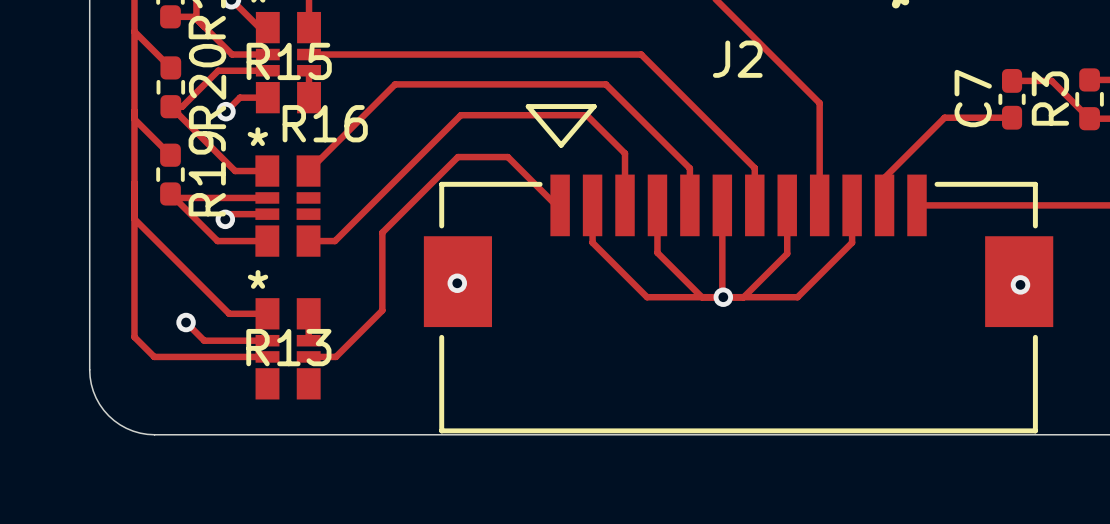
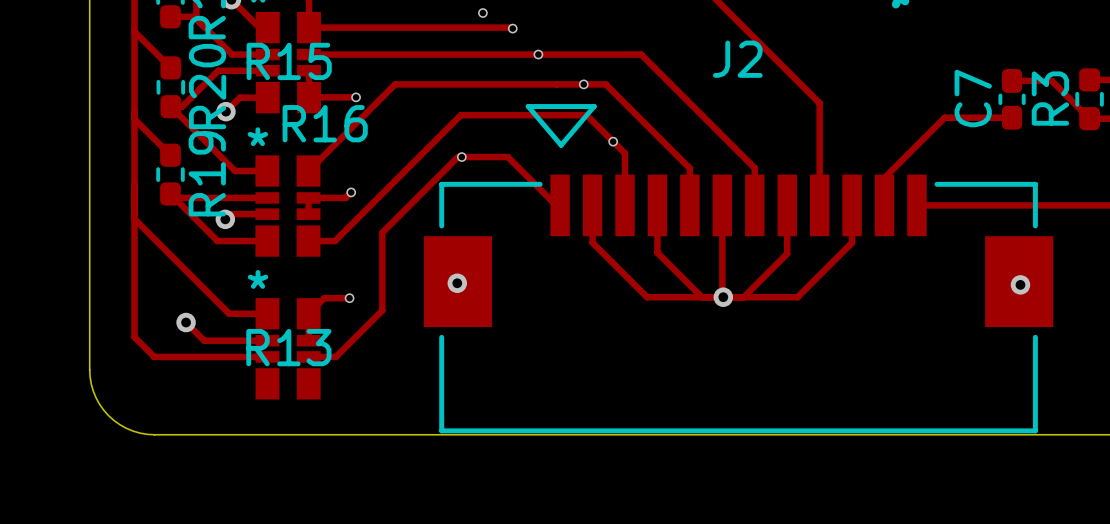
via: none -> (482, 13)
track: none -> (309, 27) (512, 28)
via: none -> (512, 28)
via: none -> (538, 54)
via: none -> (583, 84)
track: none -> (309, 97) (356, 97)
via: none -> (356, 97)
via: none -> (613, 141)
via: none -> (461, 157)
track: none -> (351, 192) (345, 197) (308, 197) (308, 214)
via: none -> (351, 192)
track: none -> (349, 298) (324, 298) (308, 313)
via: none -> (349, 298)

